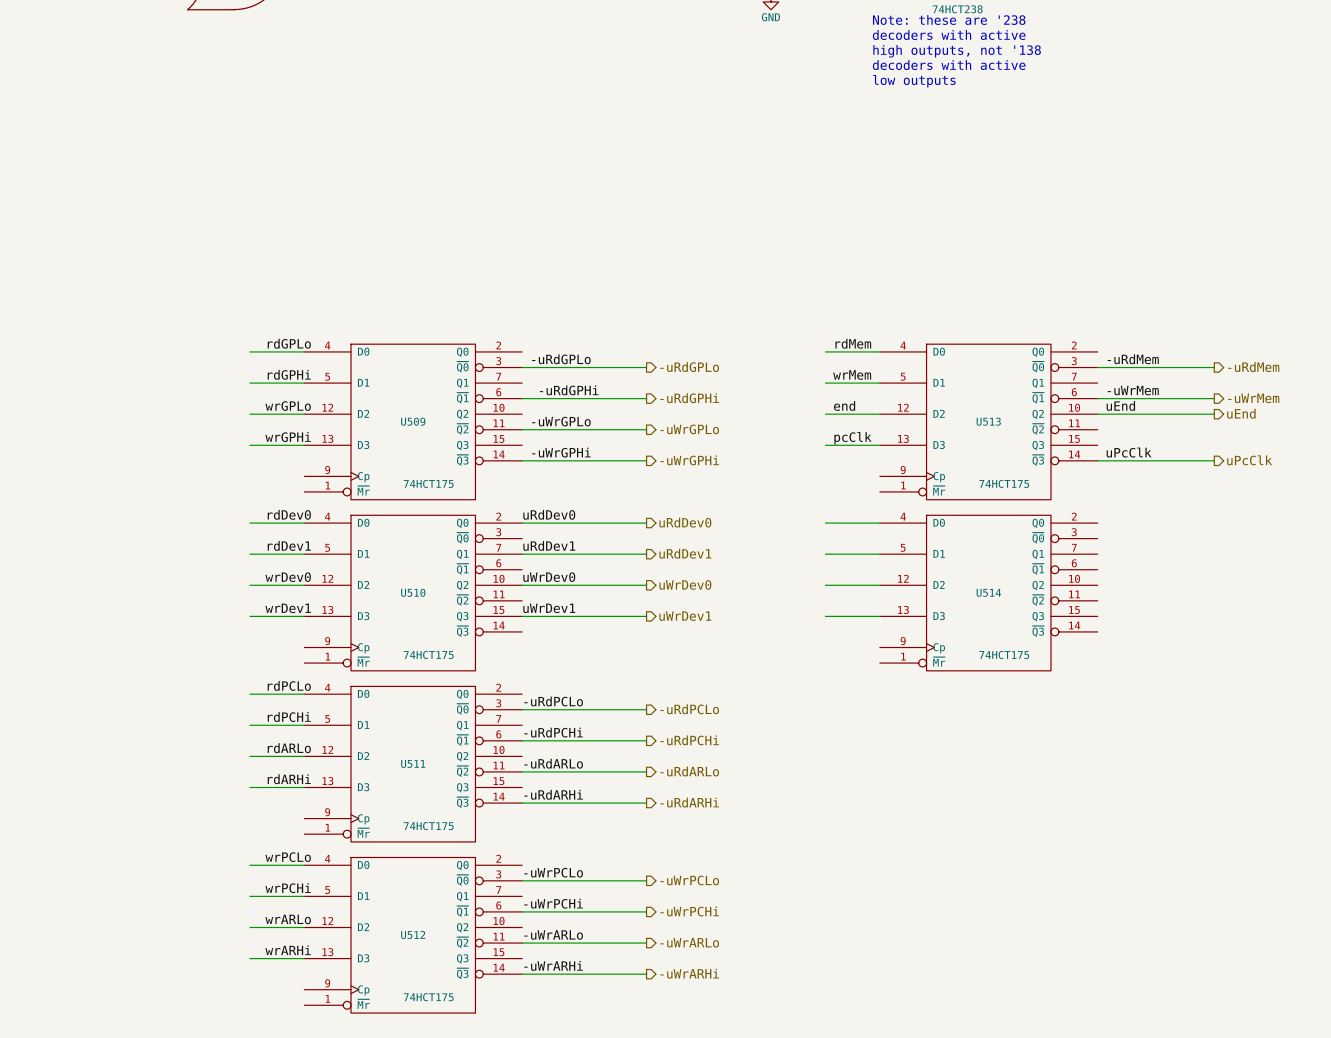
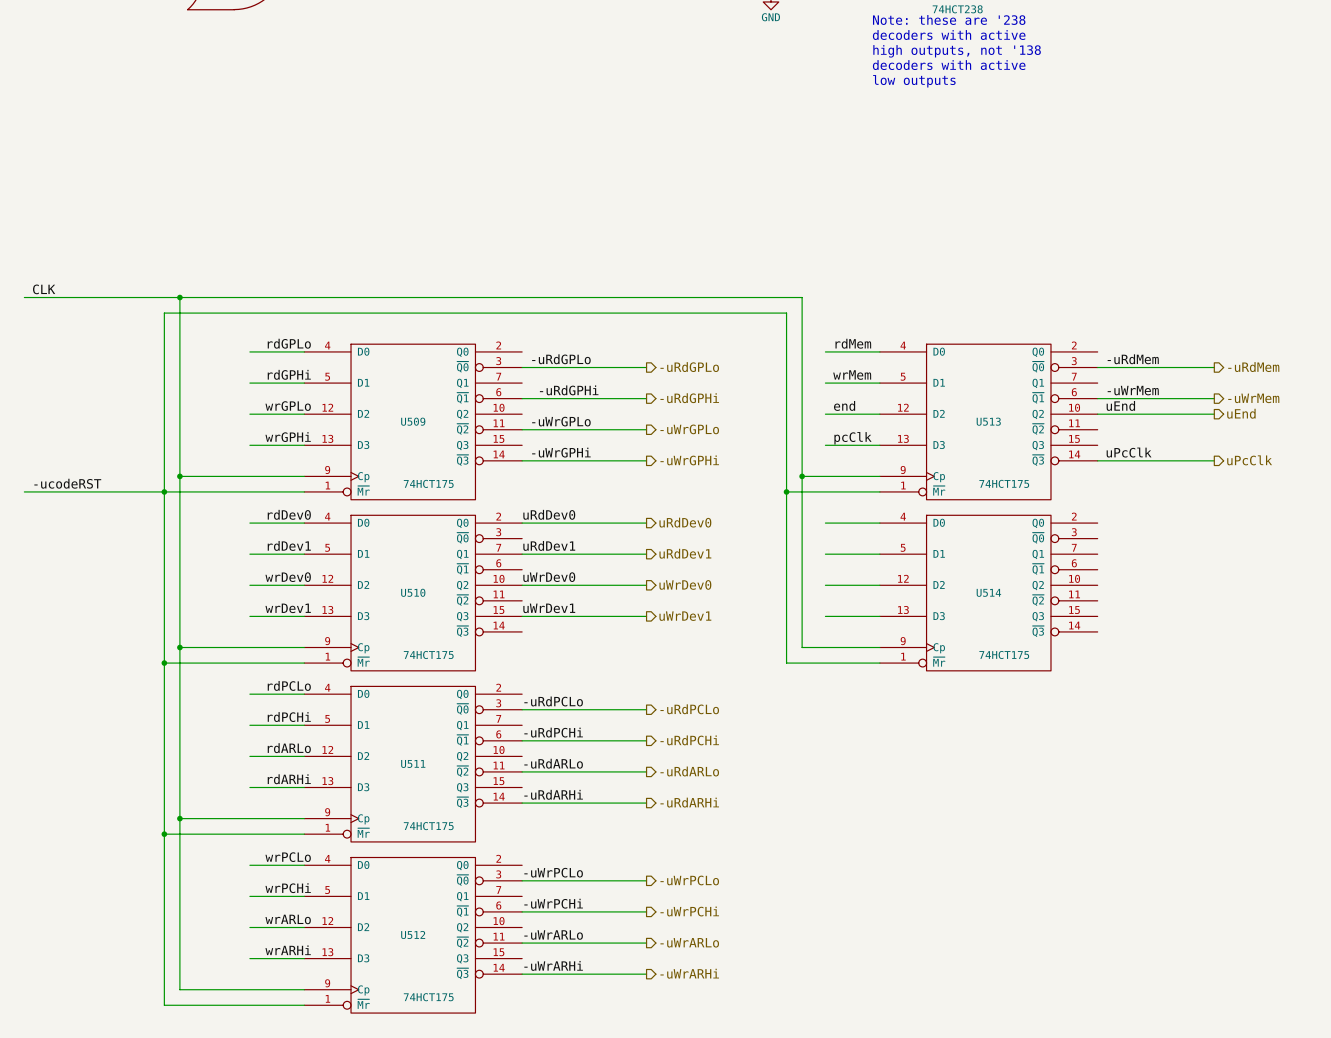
label: none -> CLK (44, 289)
wire: none -> (24, 297) (802, 297) (802, 647) (879, 647)
wire: none -> (179, 297) (179, 989) (304, 989)
junction: none -> (179, 297)
wire: none -> (179, 476) (304, 476)
junction: none -> (179, 476)
wire: none -> (802, 476) (879, 476)
junction: none -> (802, 476)
label: none -> -ucodeRST (67, 483)
wire: none -> (24, 491) (304, 491)
junction: none -> (164, 491)
wire: none -> (786, 491) (879, 491)
junction: none -> (786, 491)
wire: none -> (179, 647) (304, 647)
junction: none -> (179, 647)
wire: none -> (164, 663) (304, 663)
junction: none -> (164, 663)
wire: none -> (879, 663) (786, 663) (786, 313) (164, 313) (164, 1005) (304, 1005)
wire: none -> (179, 818) (304, 818)
junction: none -> (179, 818)
wire: none -> (164, 834) (304, 834)
junction: none -> (164, 834)

